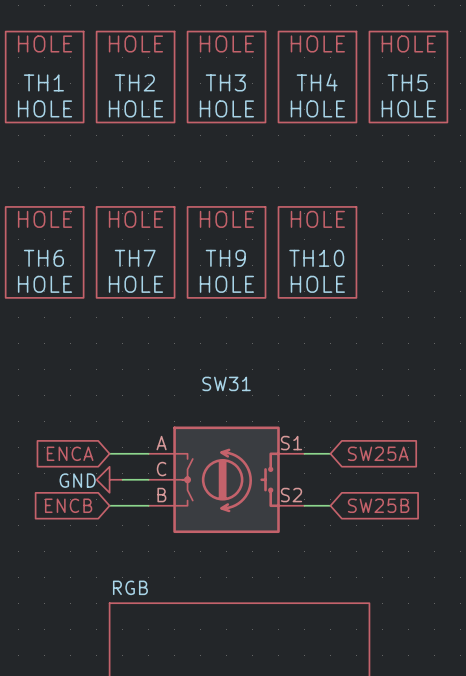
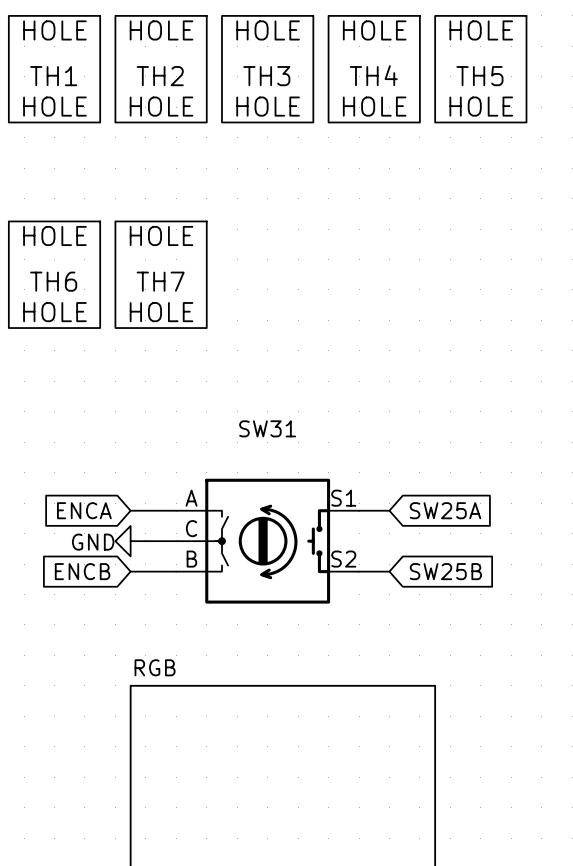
TH9: HOLE (226, 252) -> none
TH10: HOLE (317, 252) -> none

